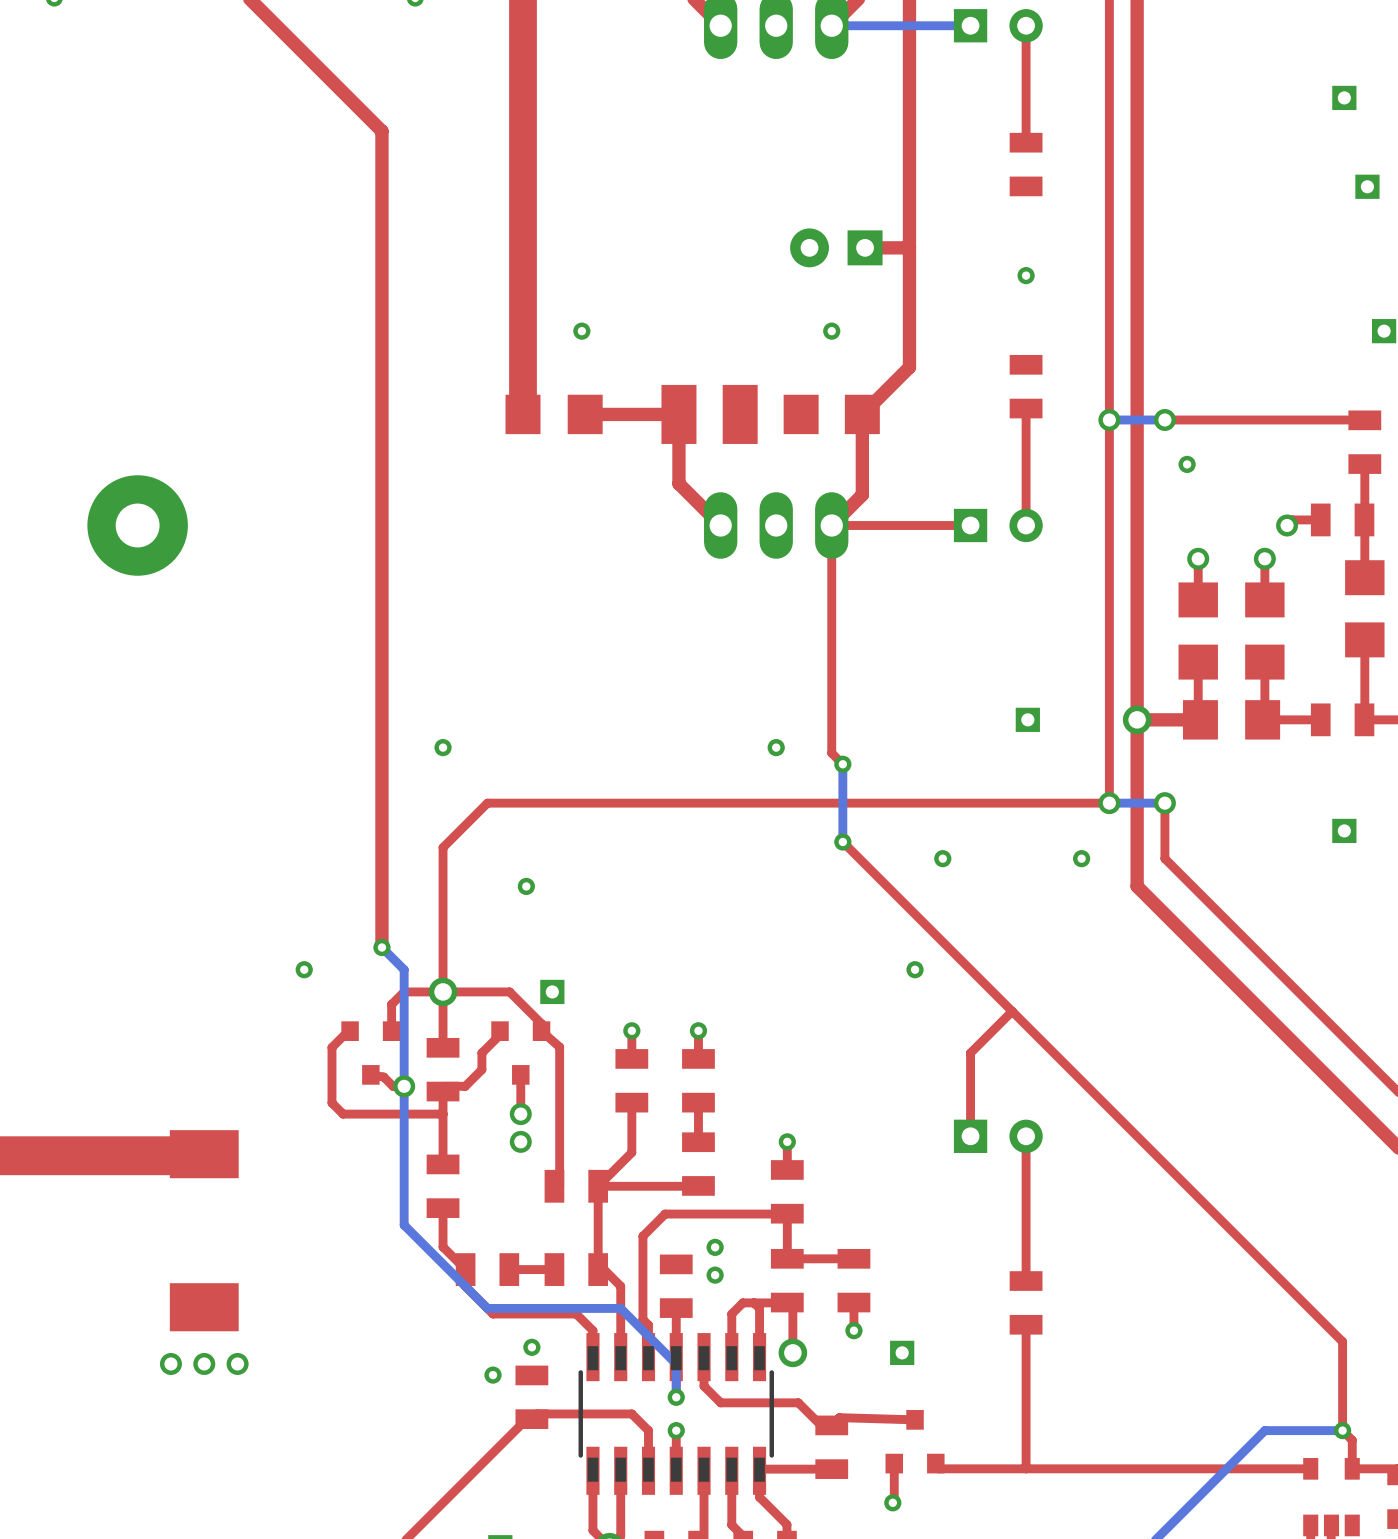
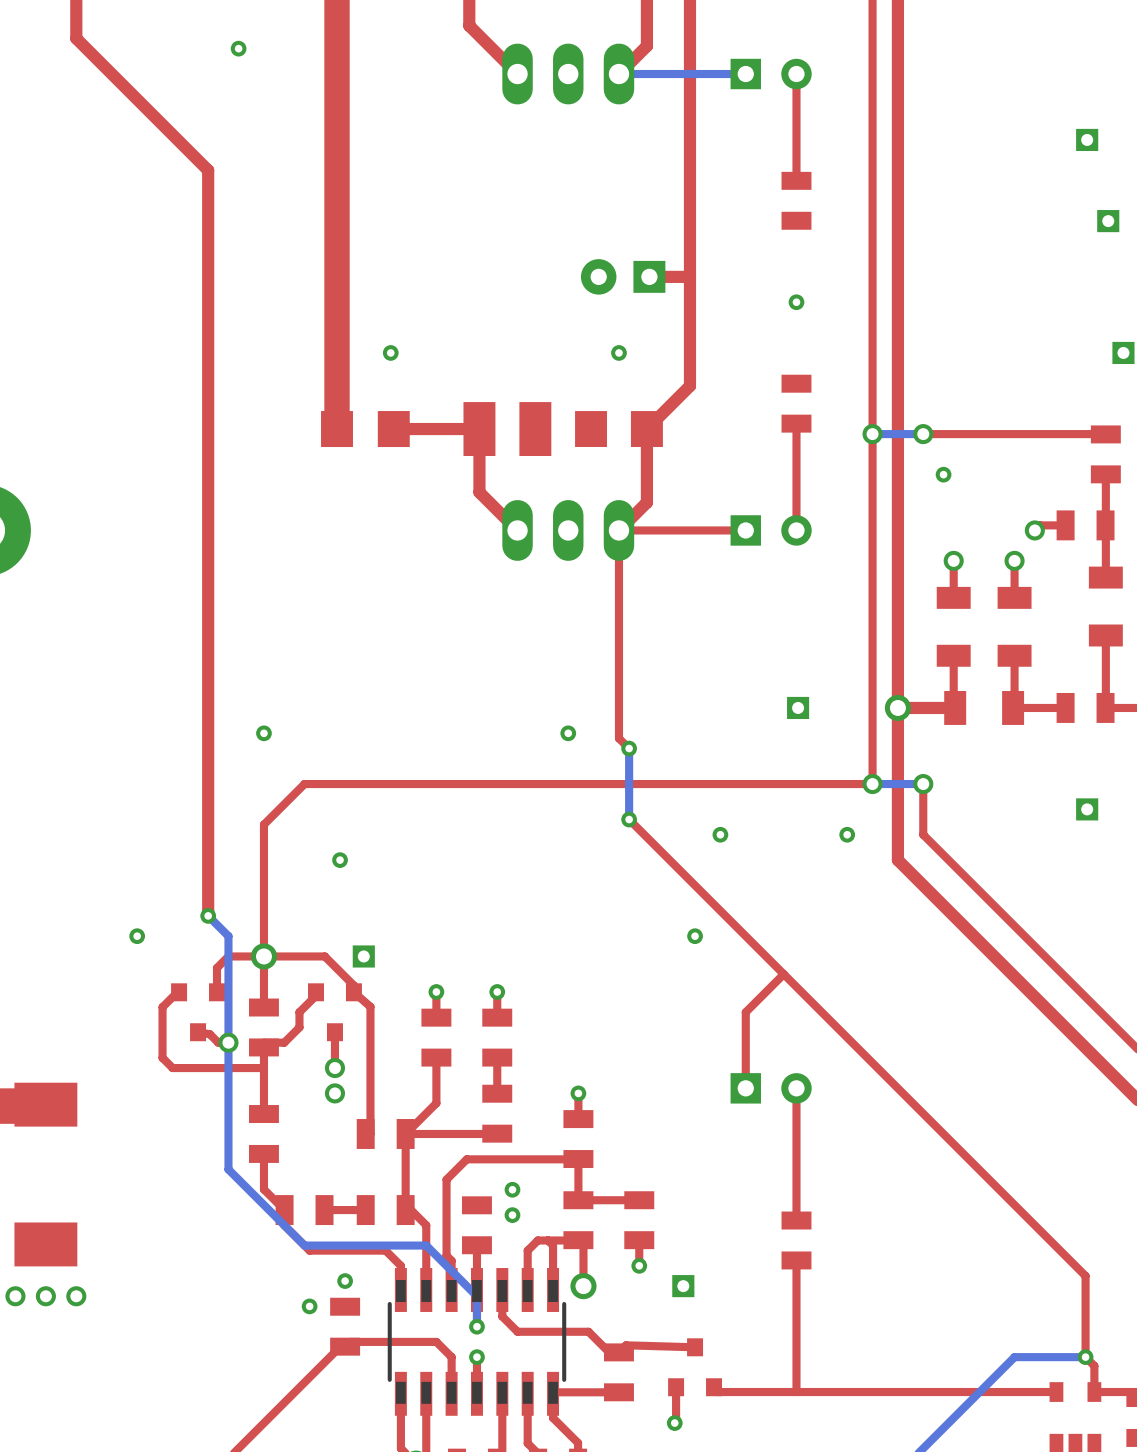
part footprint: [1345, 560, 1385, 658] -> [1088, 566, 1123, 647]
part footprint: [1178, 582, 1218, 680] -> [936, 586, 971, 667]
part footprint: [1245, 582, 1285, 680] -> [997, 586, 1032, 667]
part footprint: [1182, 700, 1281, 740] -> [944, 690, 1025, 725]

